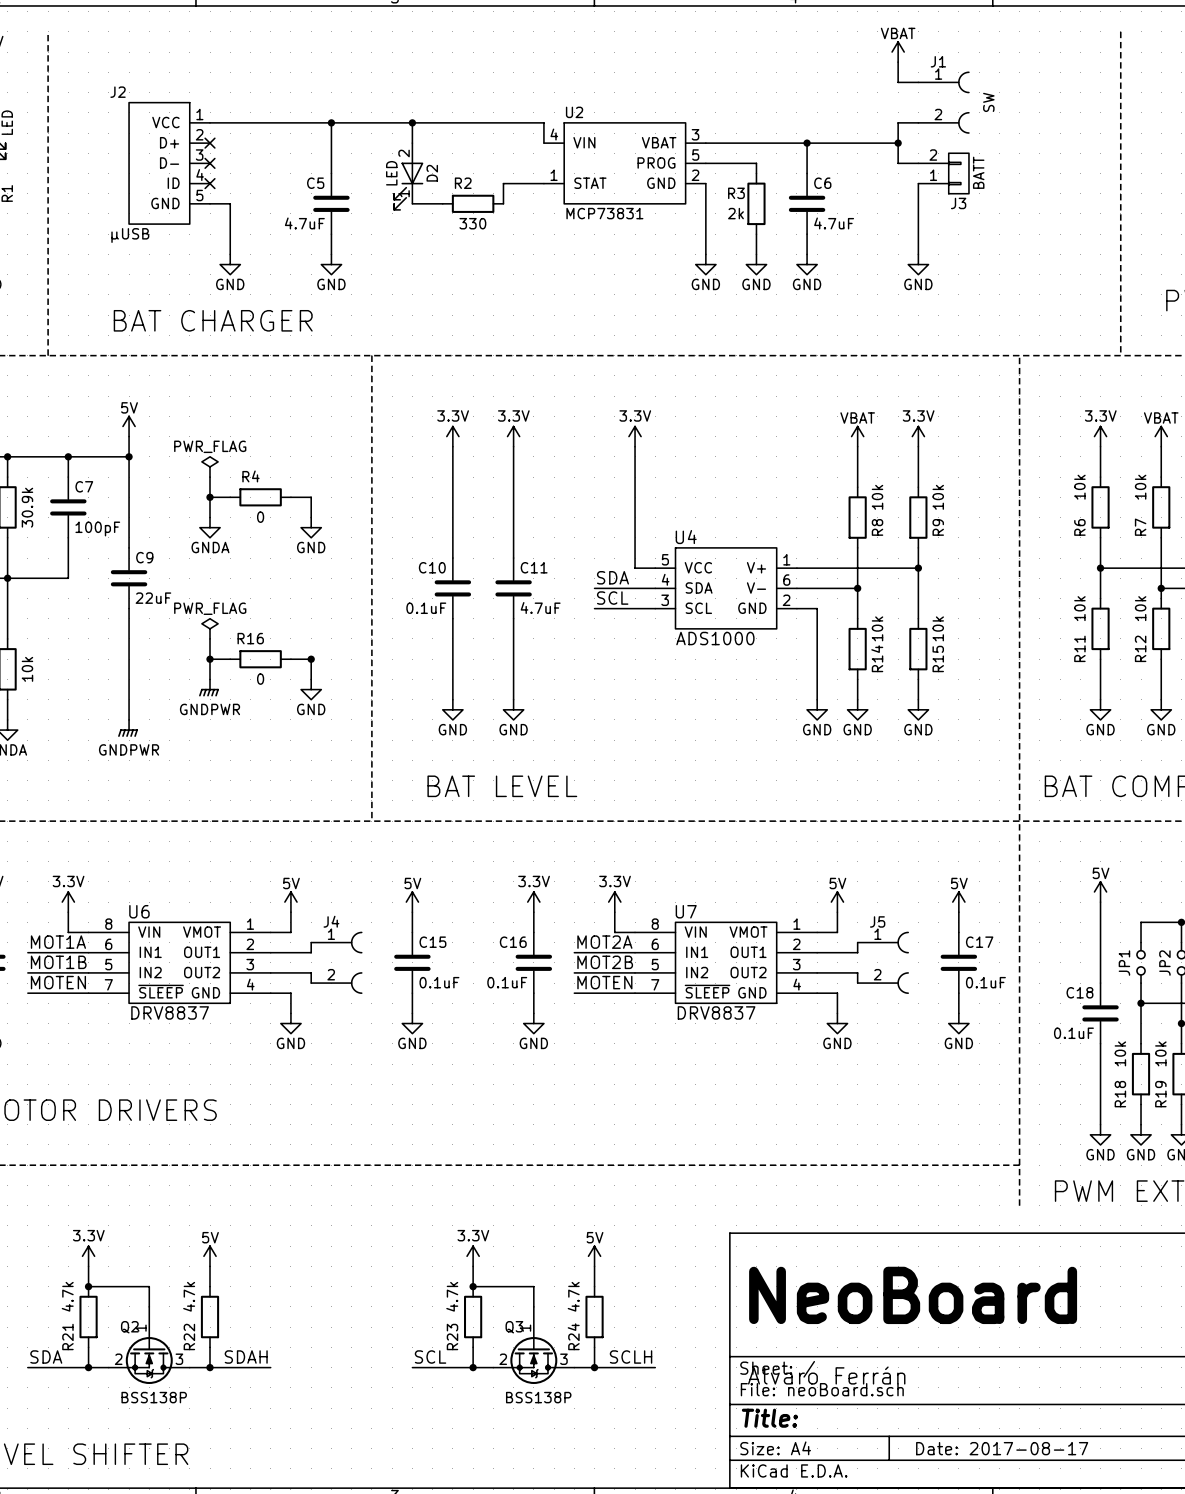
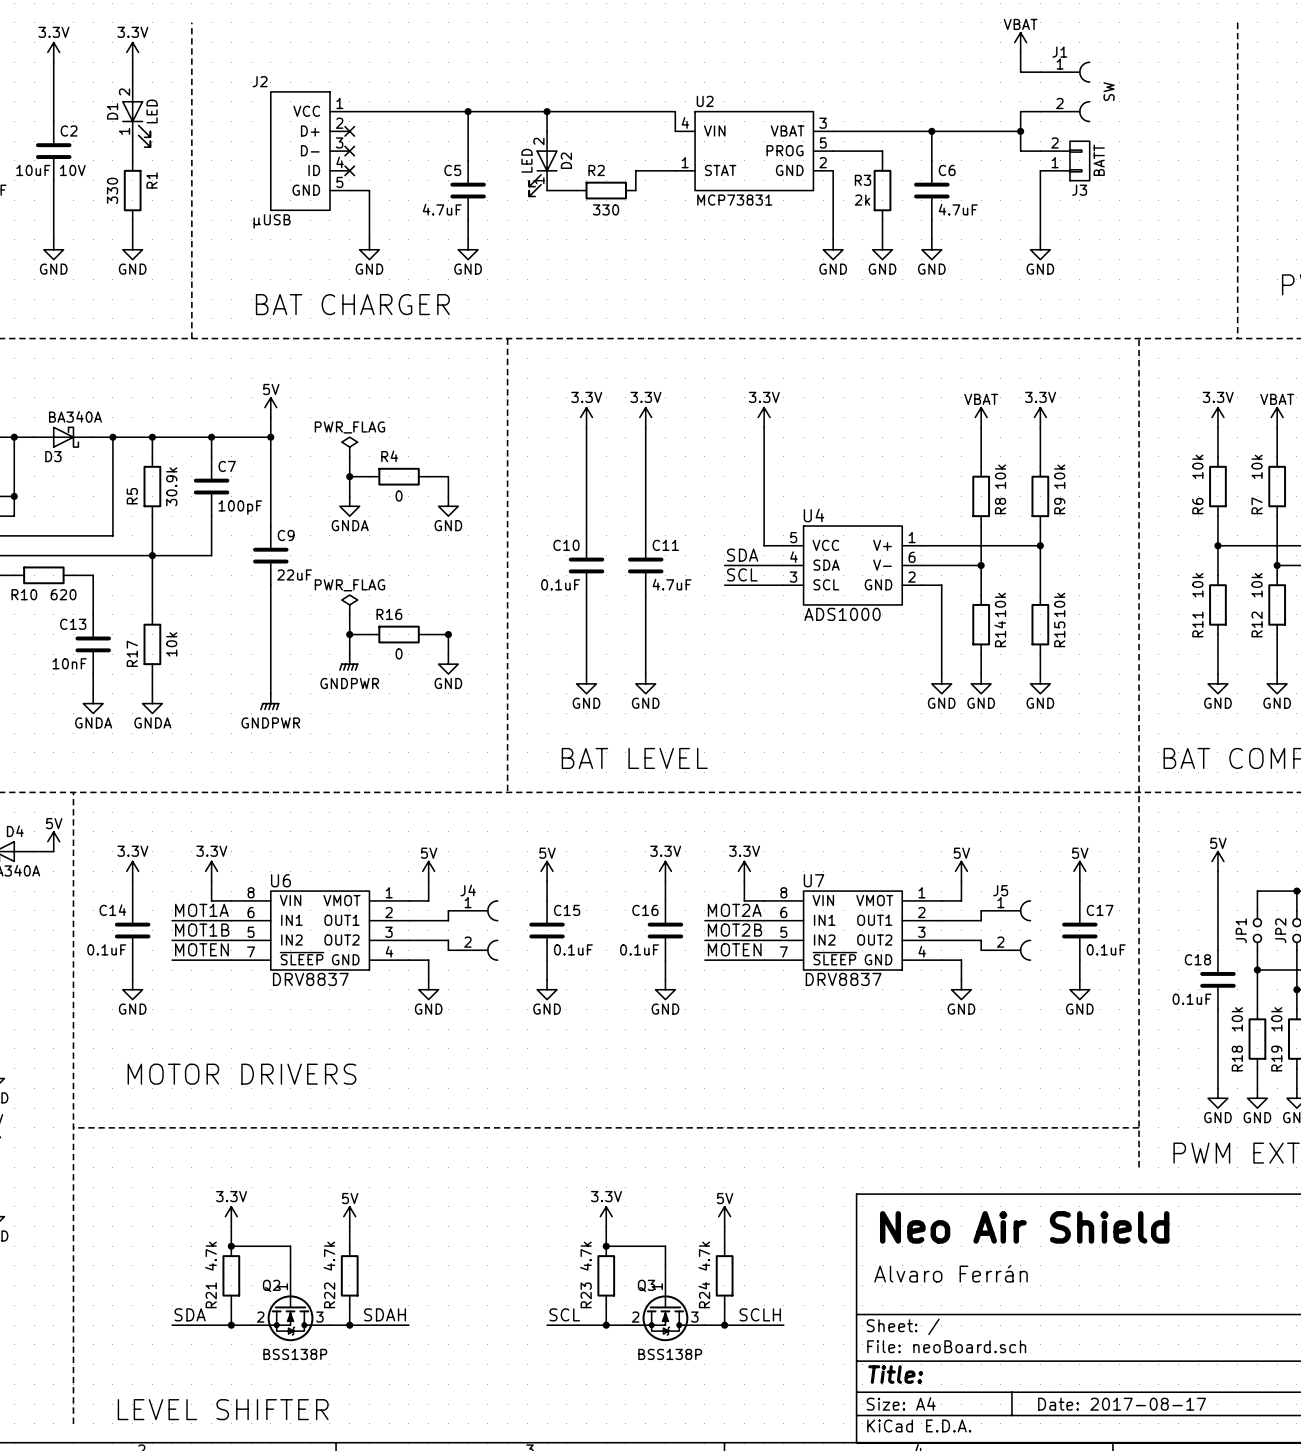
text: none -> Neo Air Shield (1024, 1227)
text: NeoBoard (913, 1295) -> none
text position: Alvaro Ferrán (826, 1375) -> Alvaro Ferrán (950, 1273)

